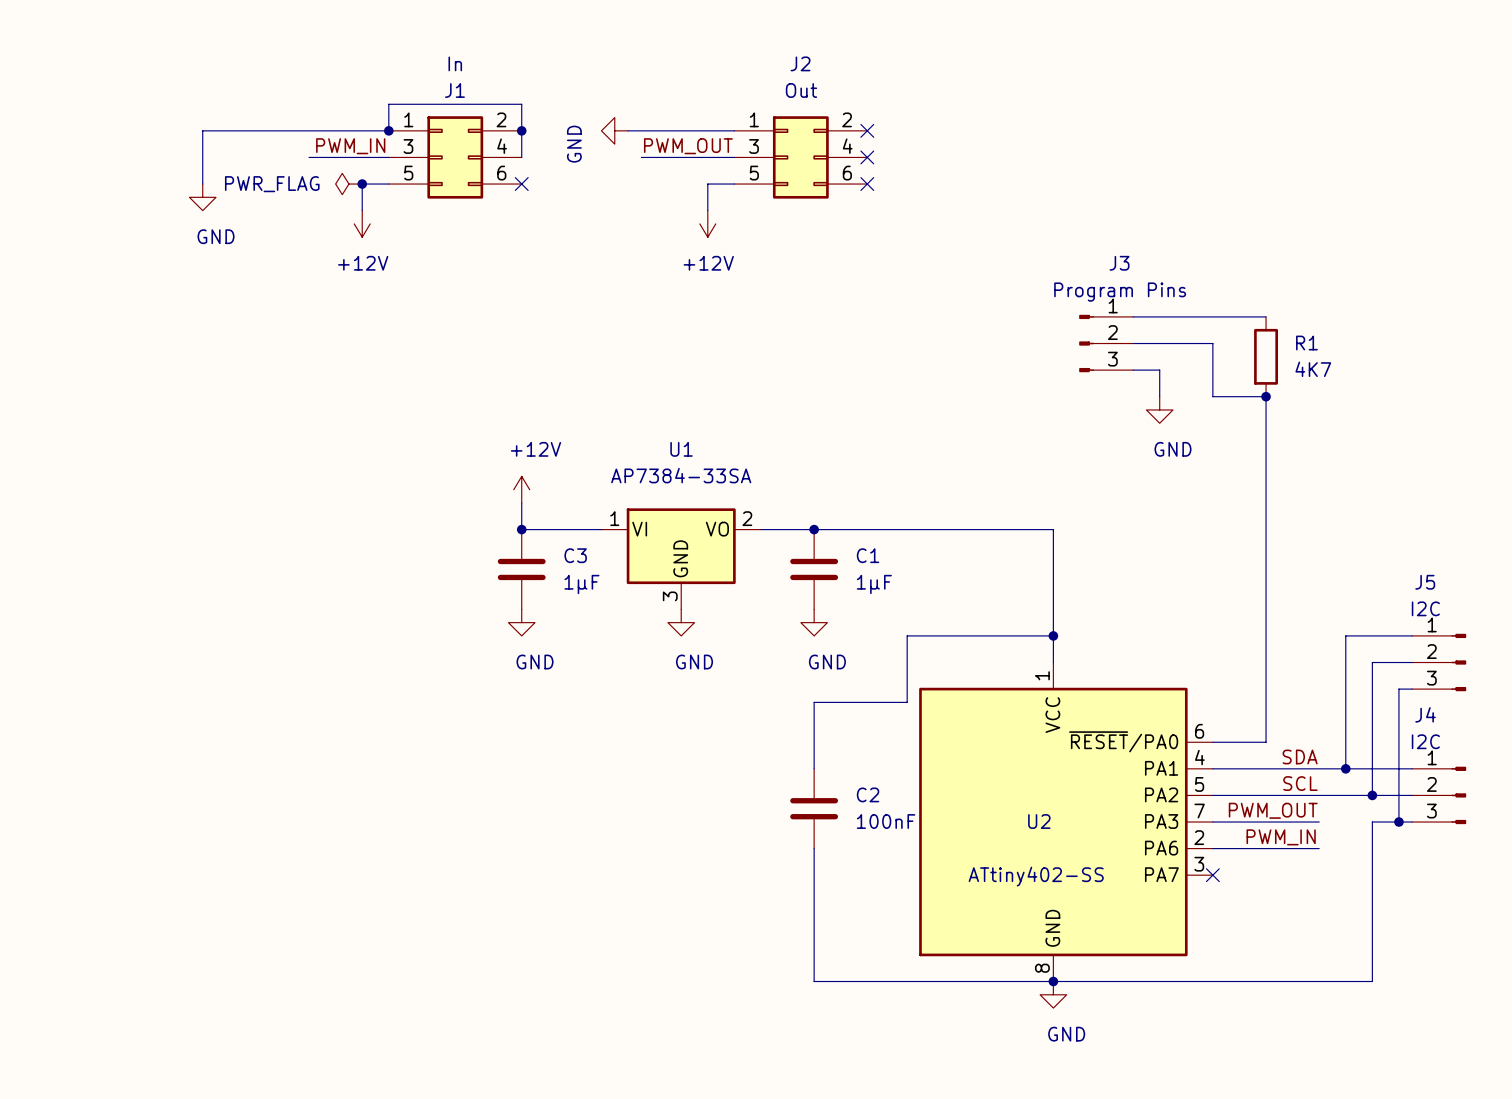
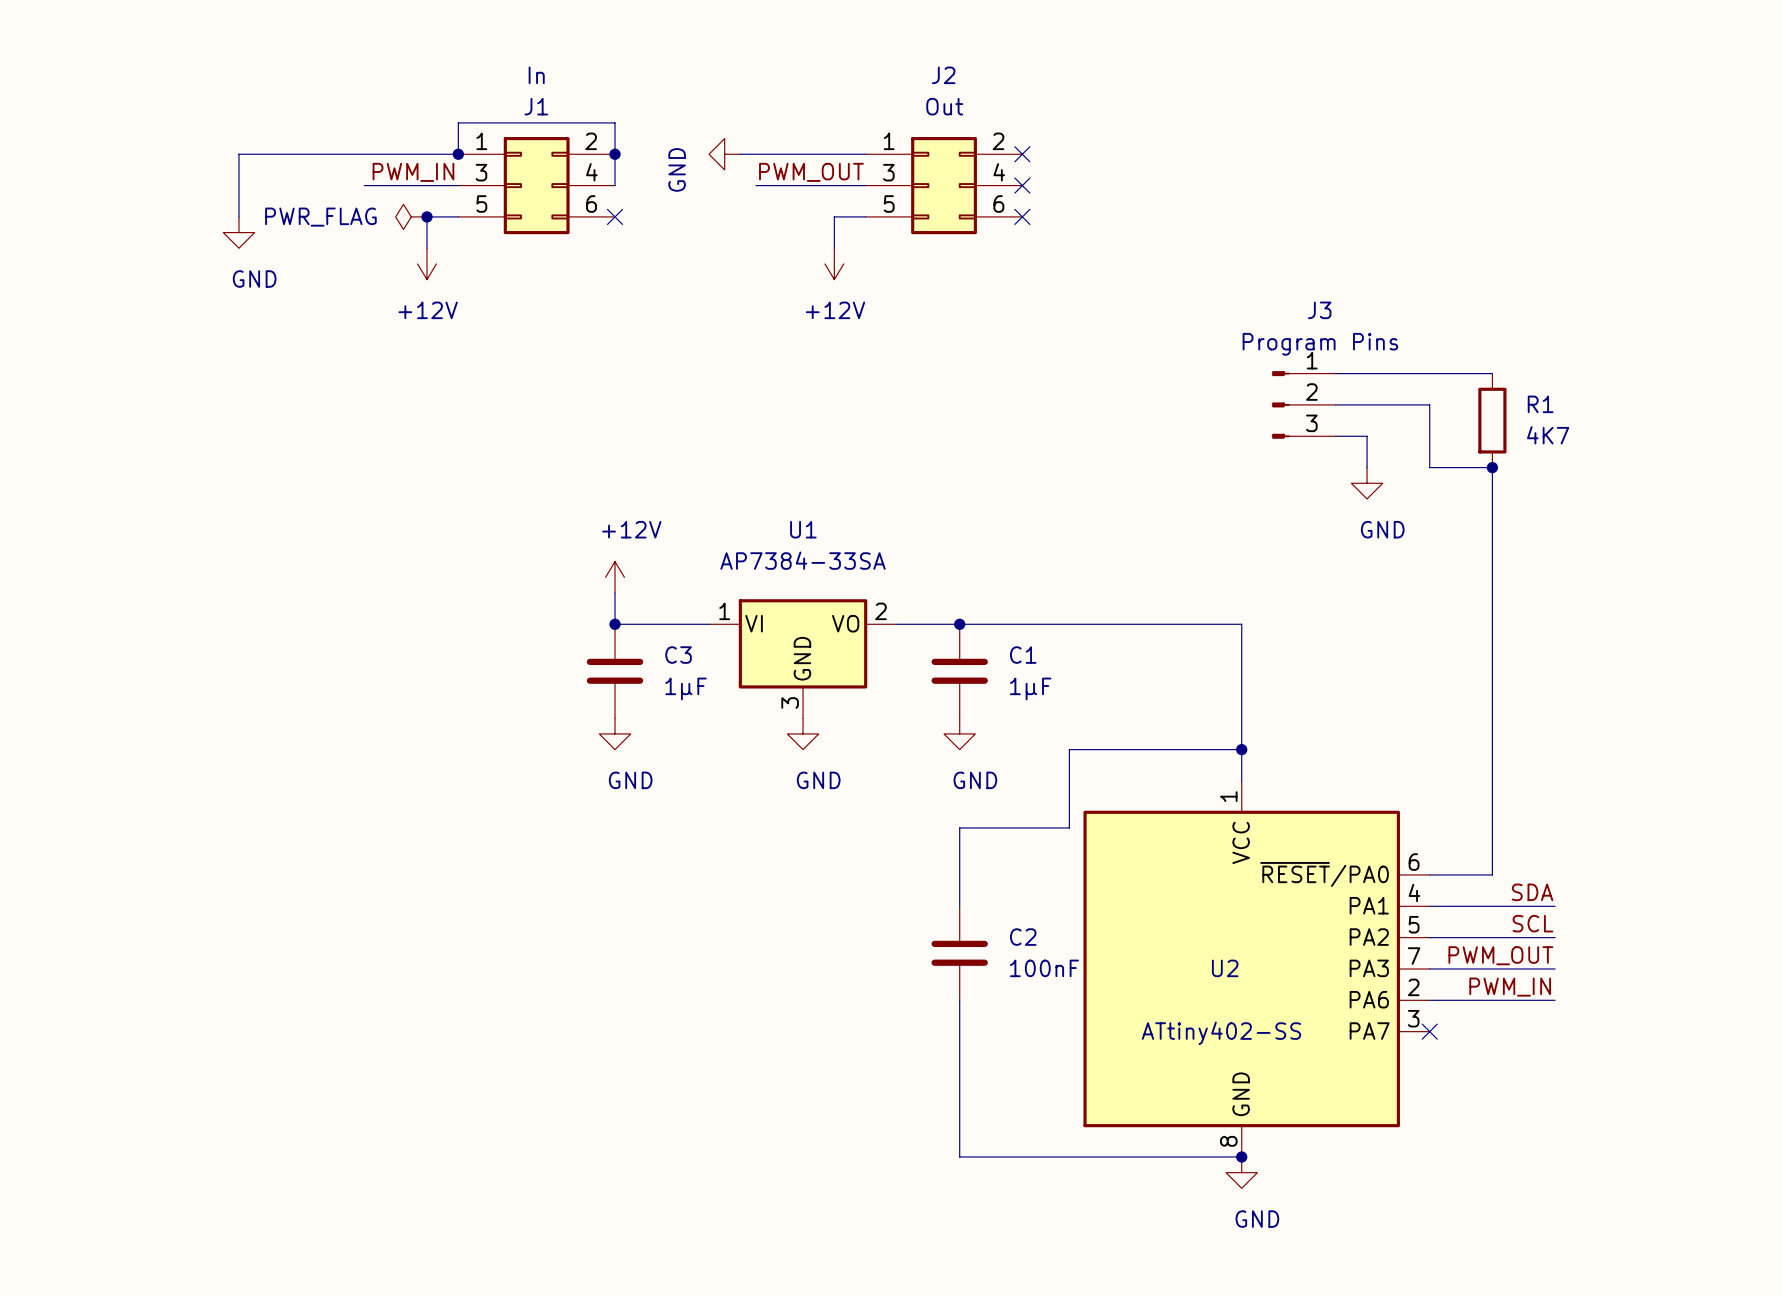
wire: (1412, 635) (1345, 635) (1345, 768) -> none
wire: (1412, 662) (1372, 662) (1372, 795) -> none
J5: I2C (1439, 662) -> none
wire: (1412, 689) (1398, 689) (1398, 822) -> none
wire: (1319, 768) (1412, 768) -> none
junction: (1345, 768) -> none
wire: (1319, 795) (1412, 795) -> none
junction: (1372, 795) -> none
J4: I2C (1439, 795) -> none
junction: (1398, 822) -> none
wire: (1412, 822) (1372, 822) (1372, 981) (1053, 981) -> none

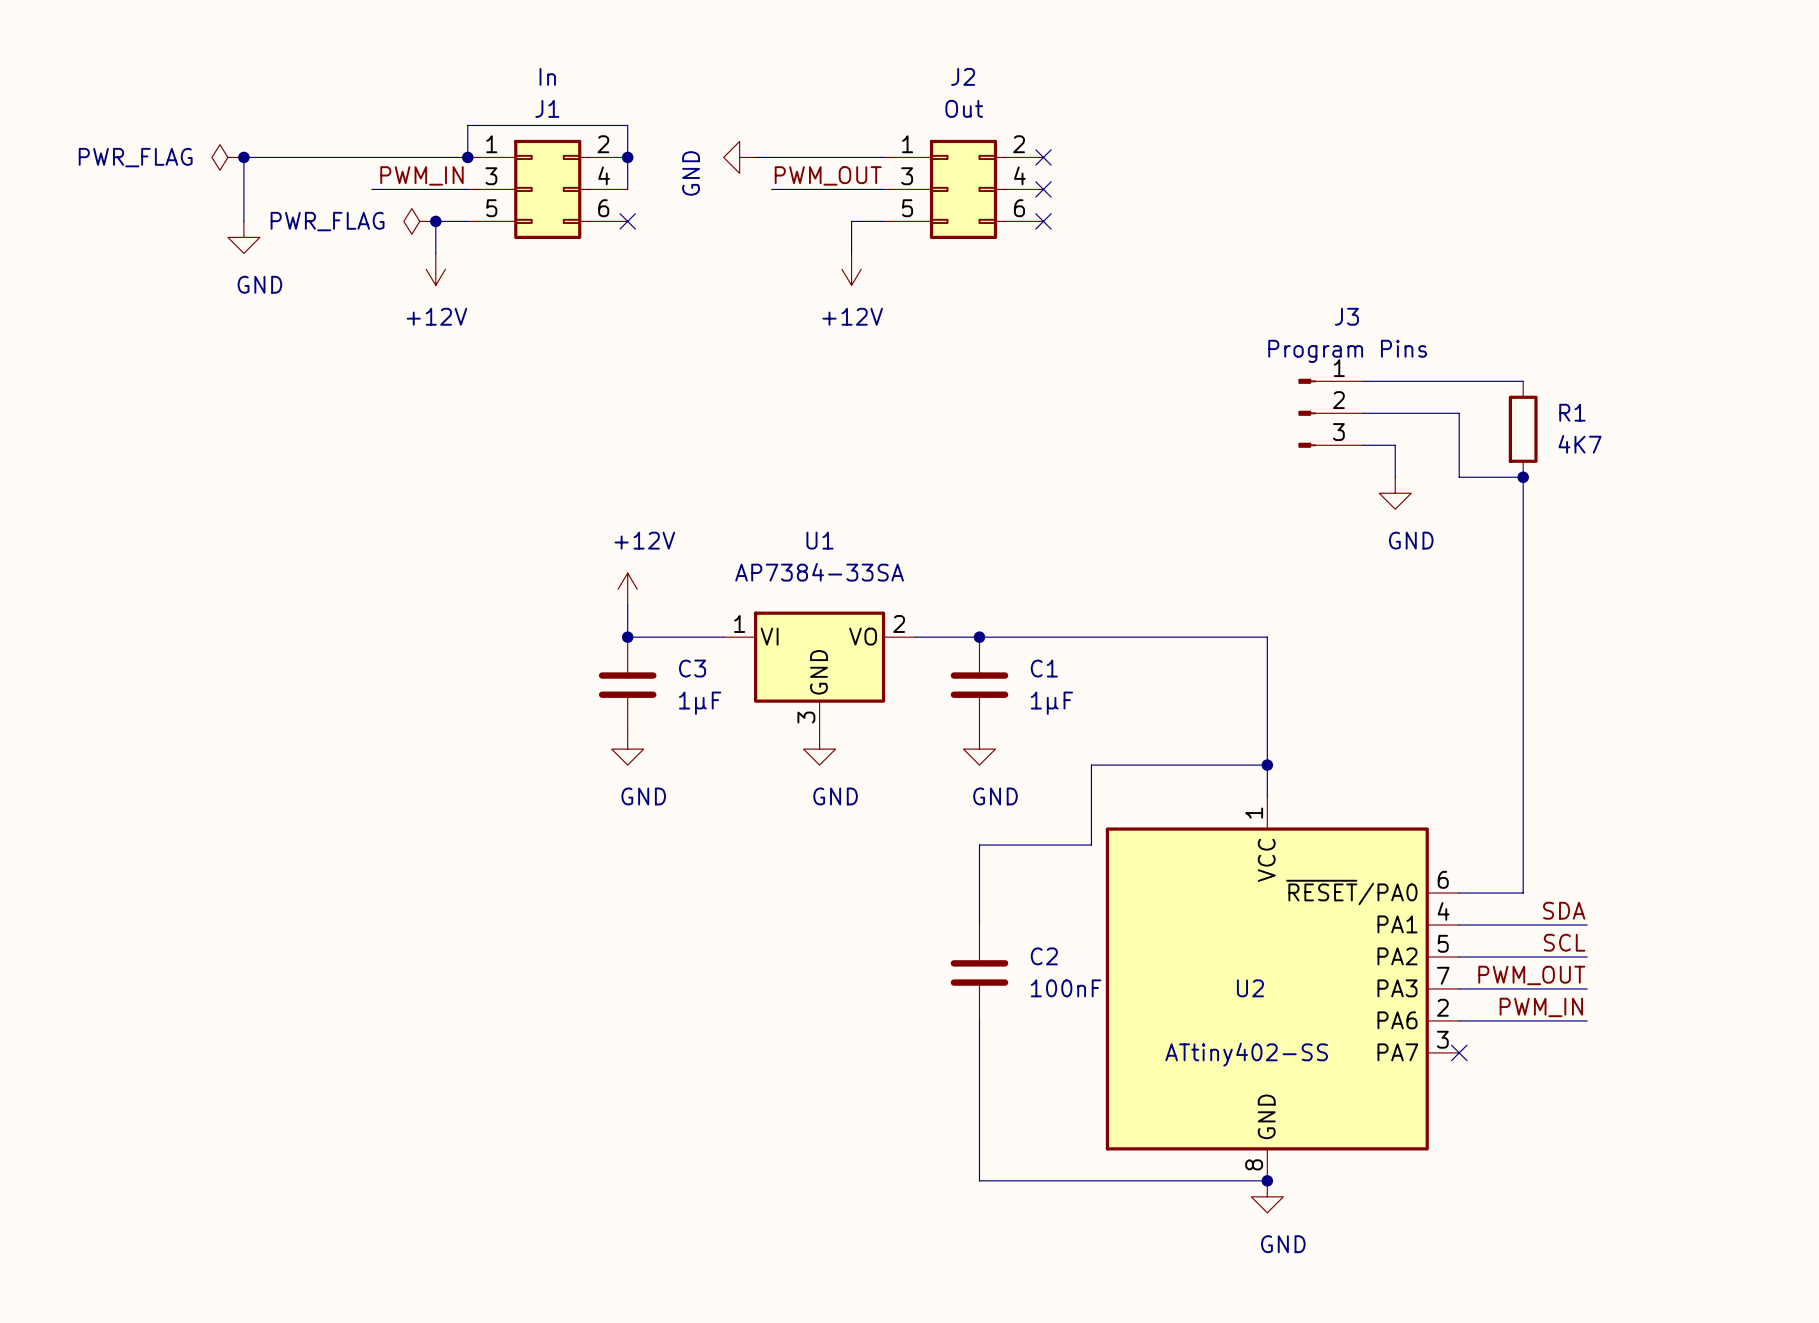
power symbol: none -> PWR_FLAG (227, 157)
junction: none -> (243, 157)

